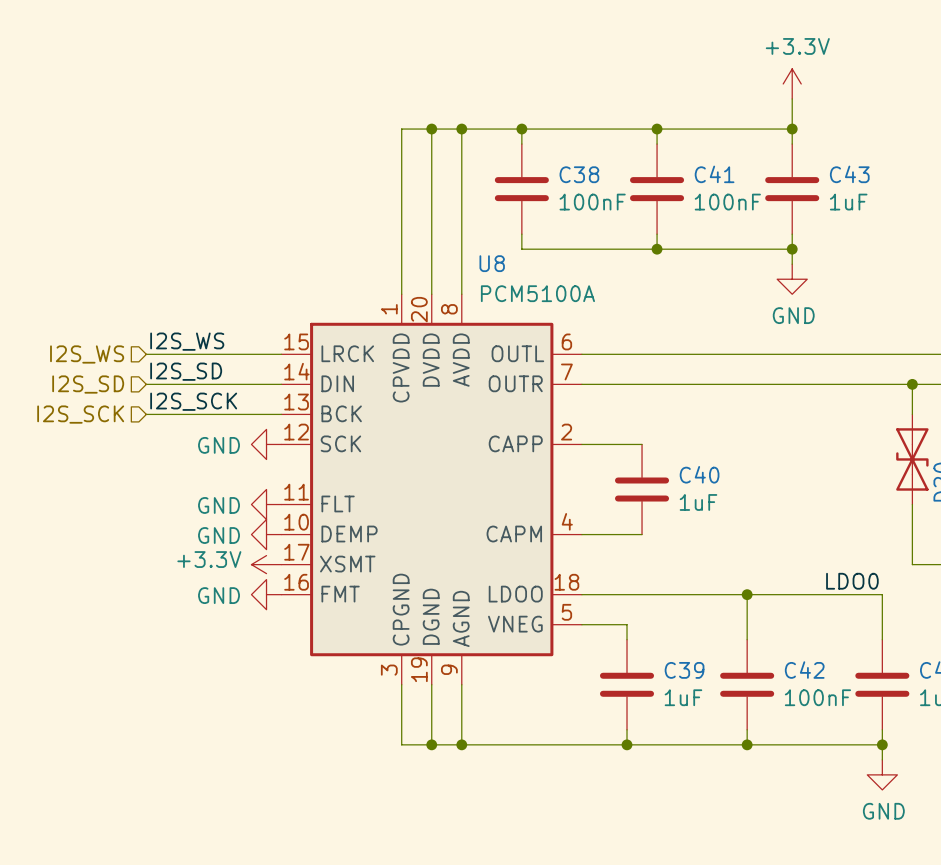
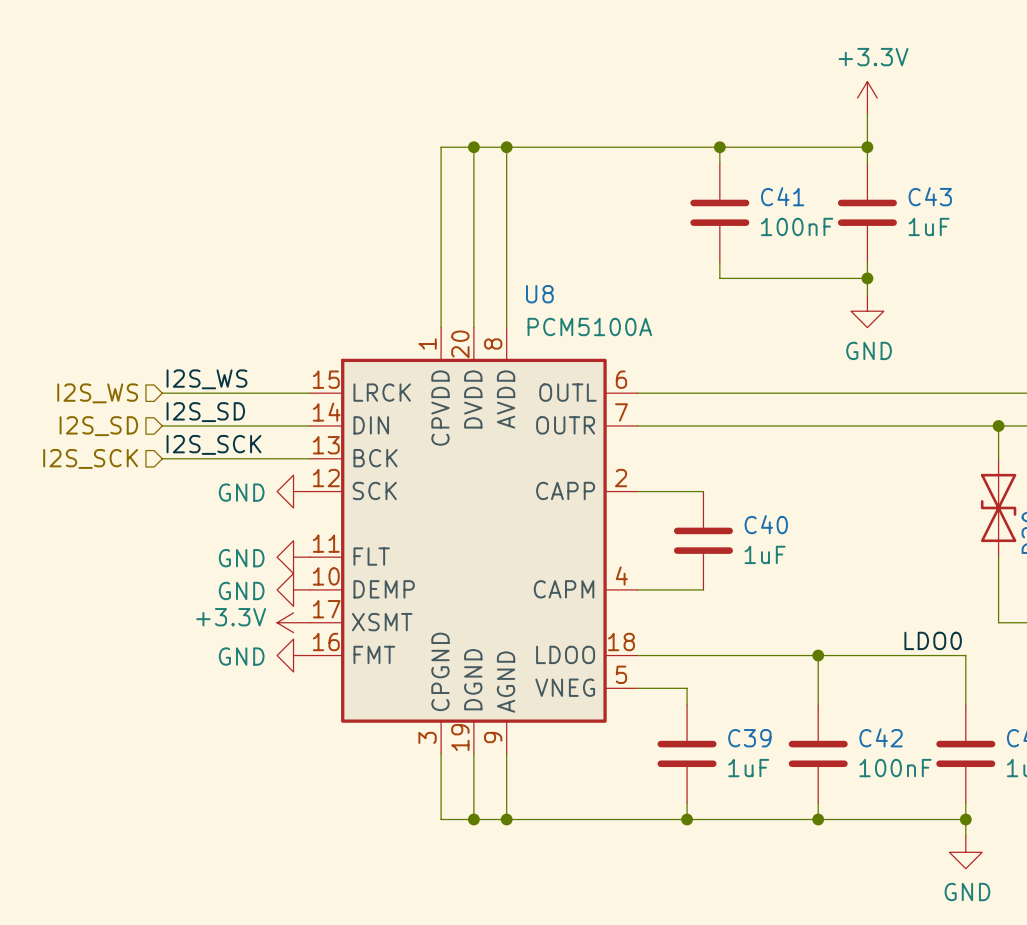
wire: (521, 129) (521, 144) -> none
junction: (521, 129) -> none
C38: 100nF (521, 189) -> none
wire: (521, 234) (521, 249) (657, 249) -> none
junction: (657, 249) -> none

